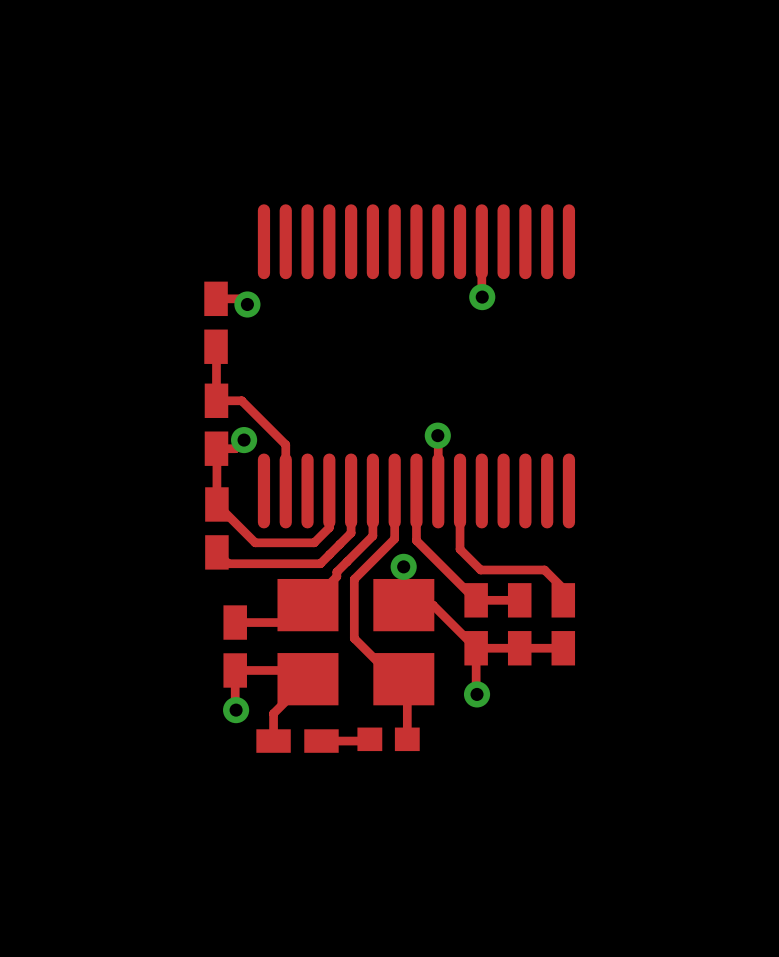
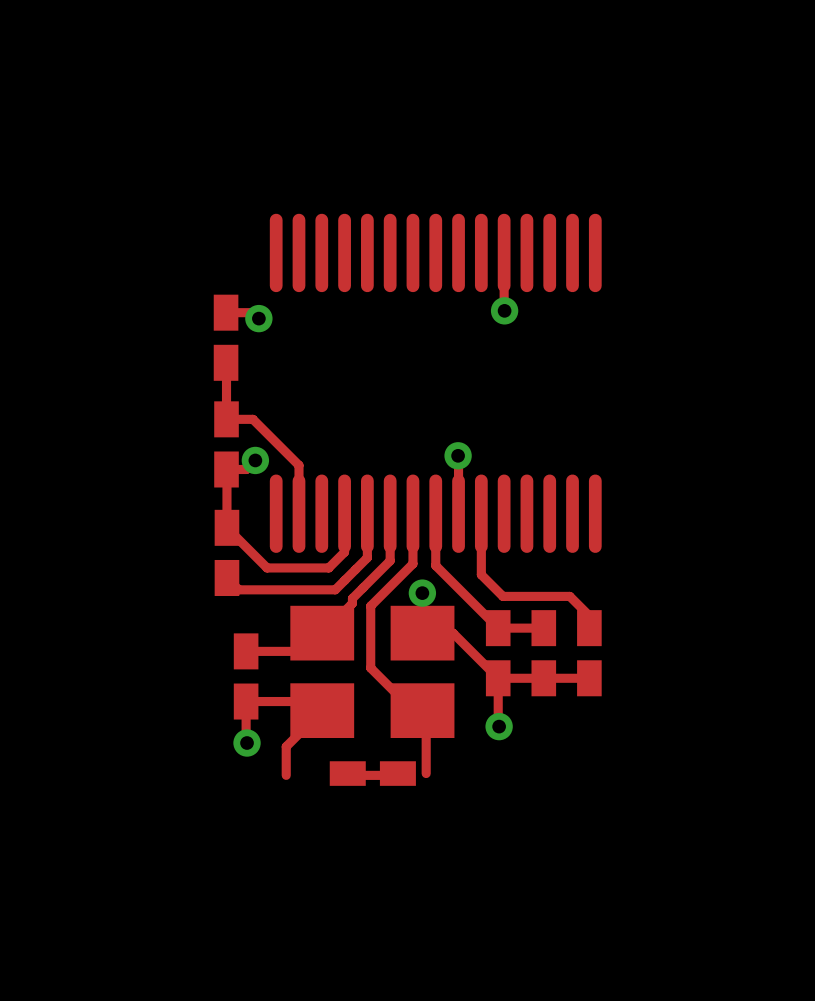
part: (388, 739) -> none
part position: (297, 741) -> (372, 773)

